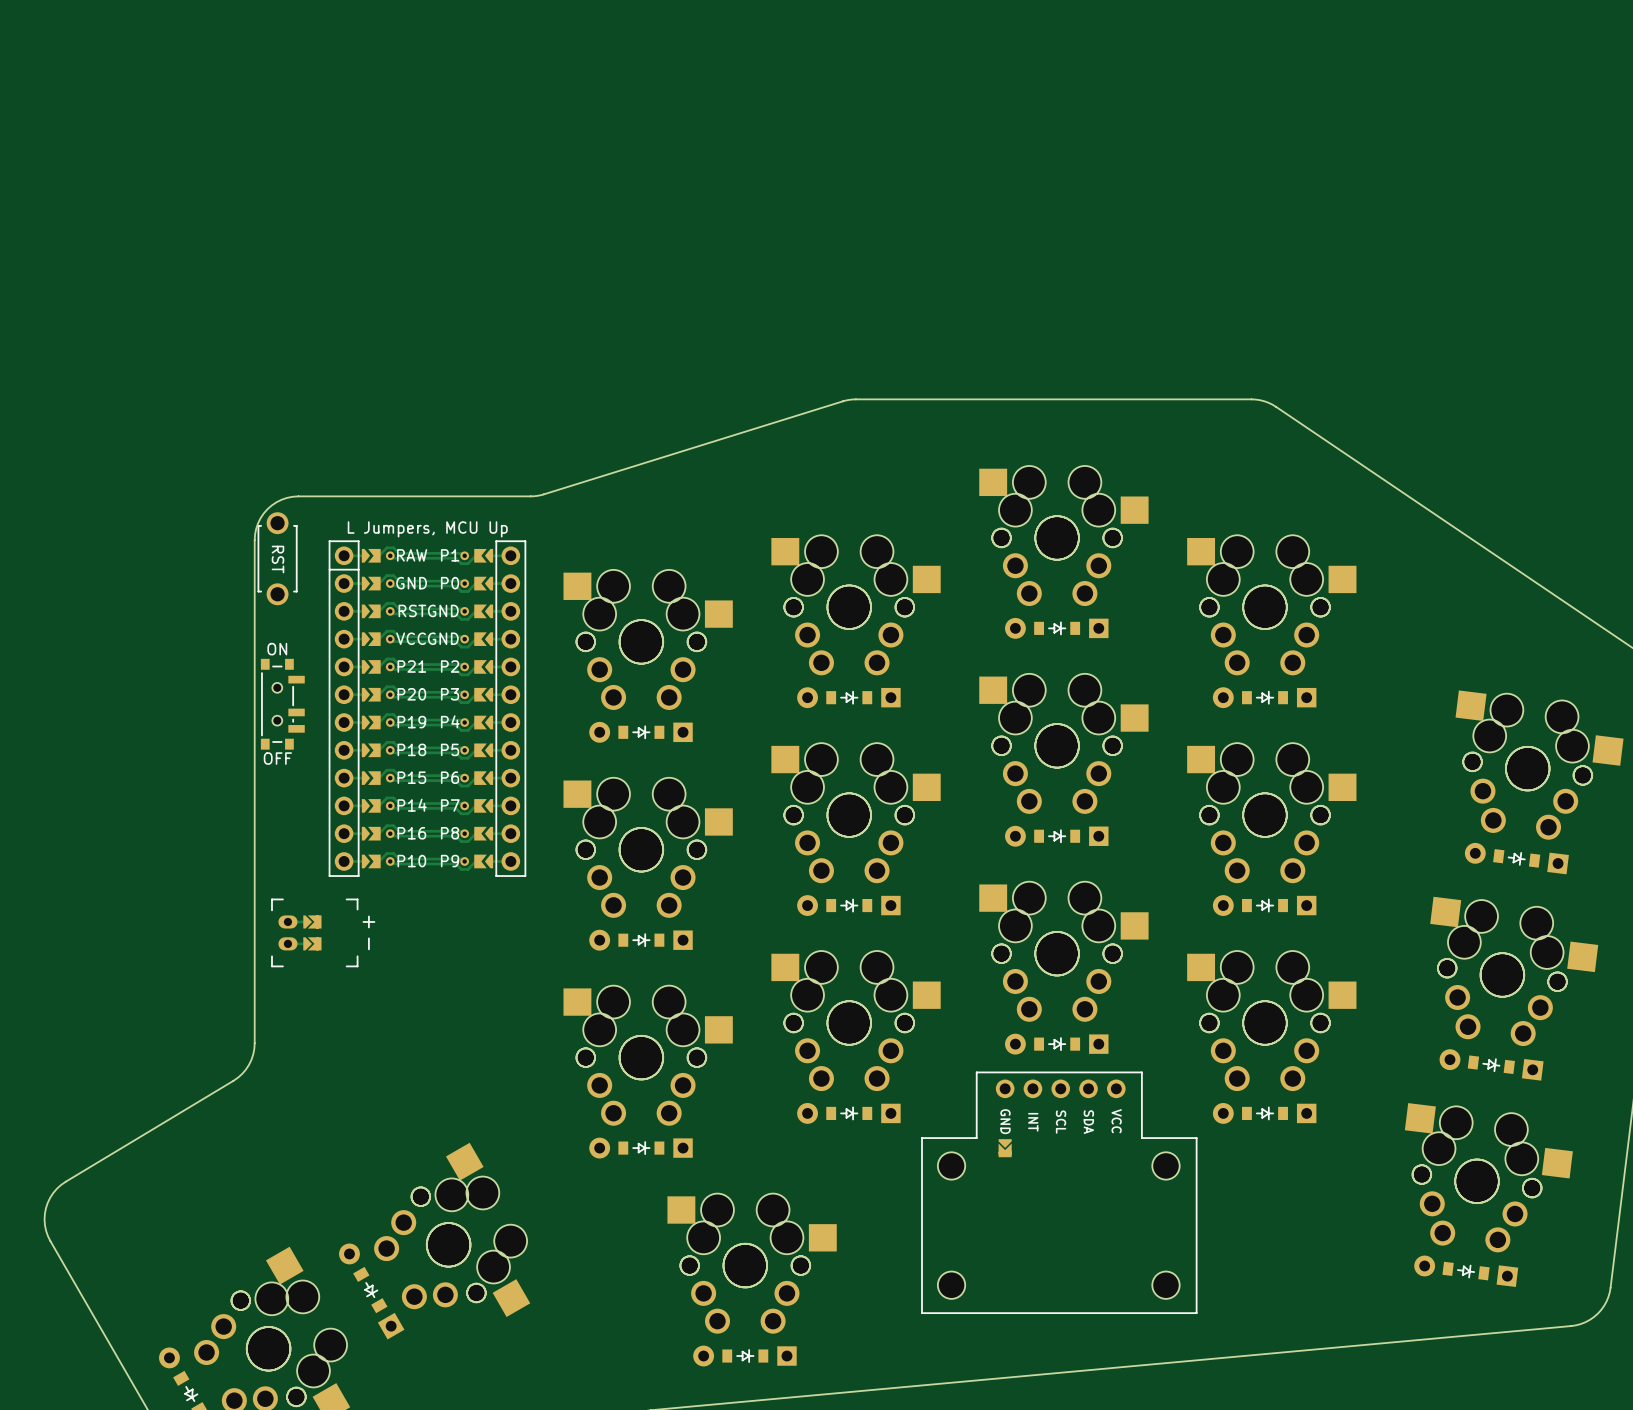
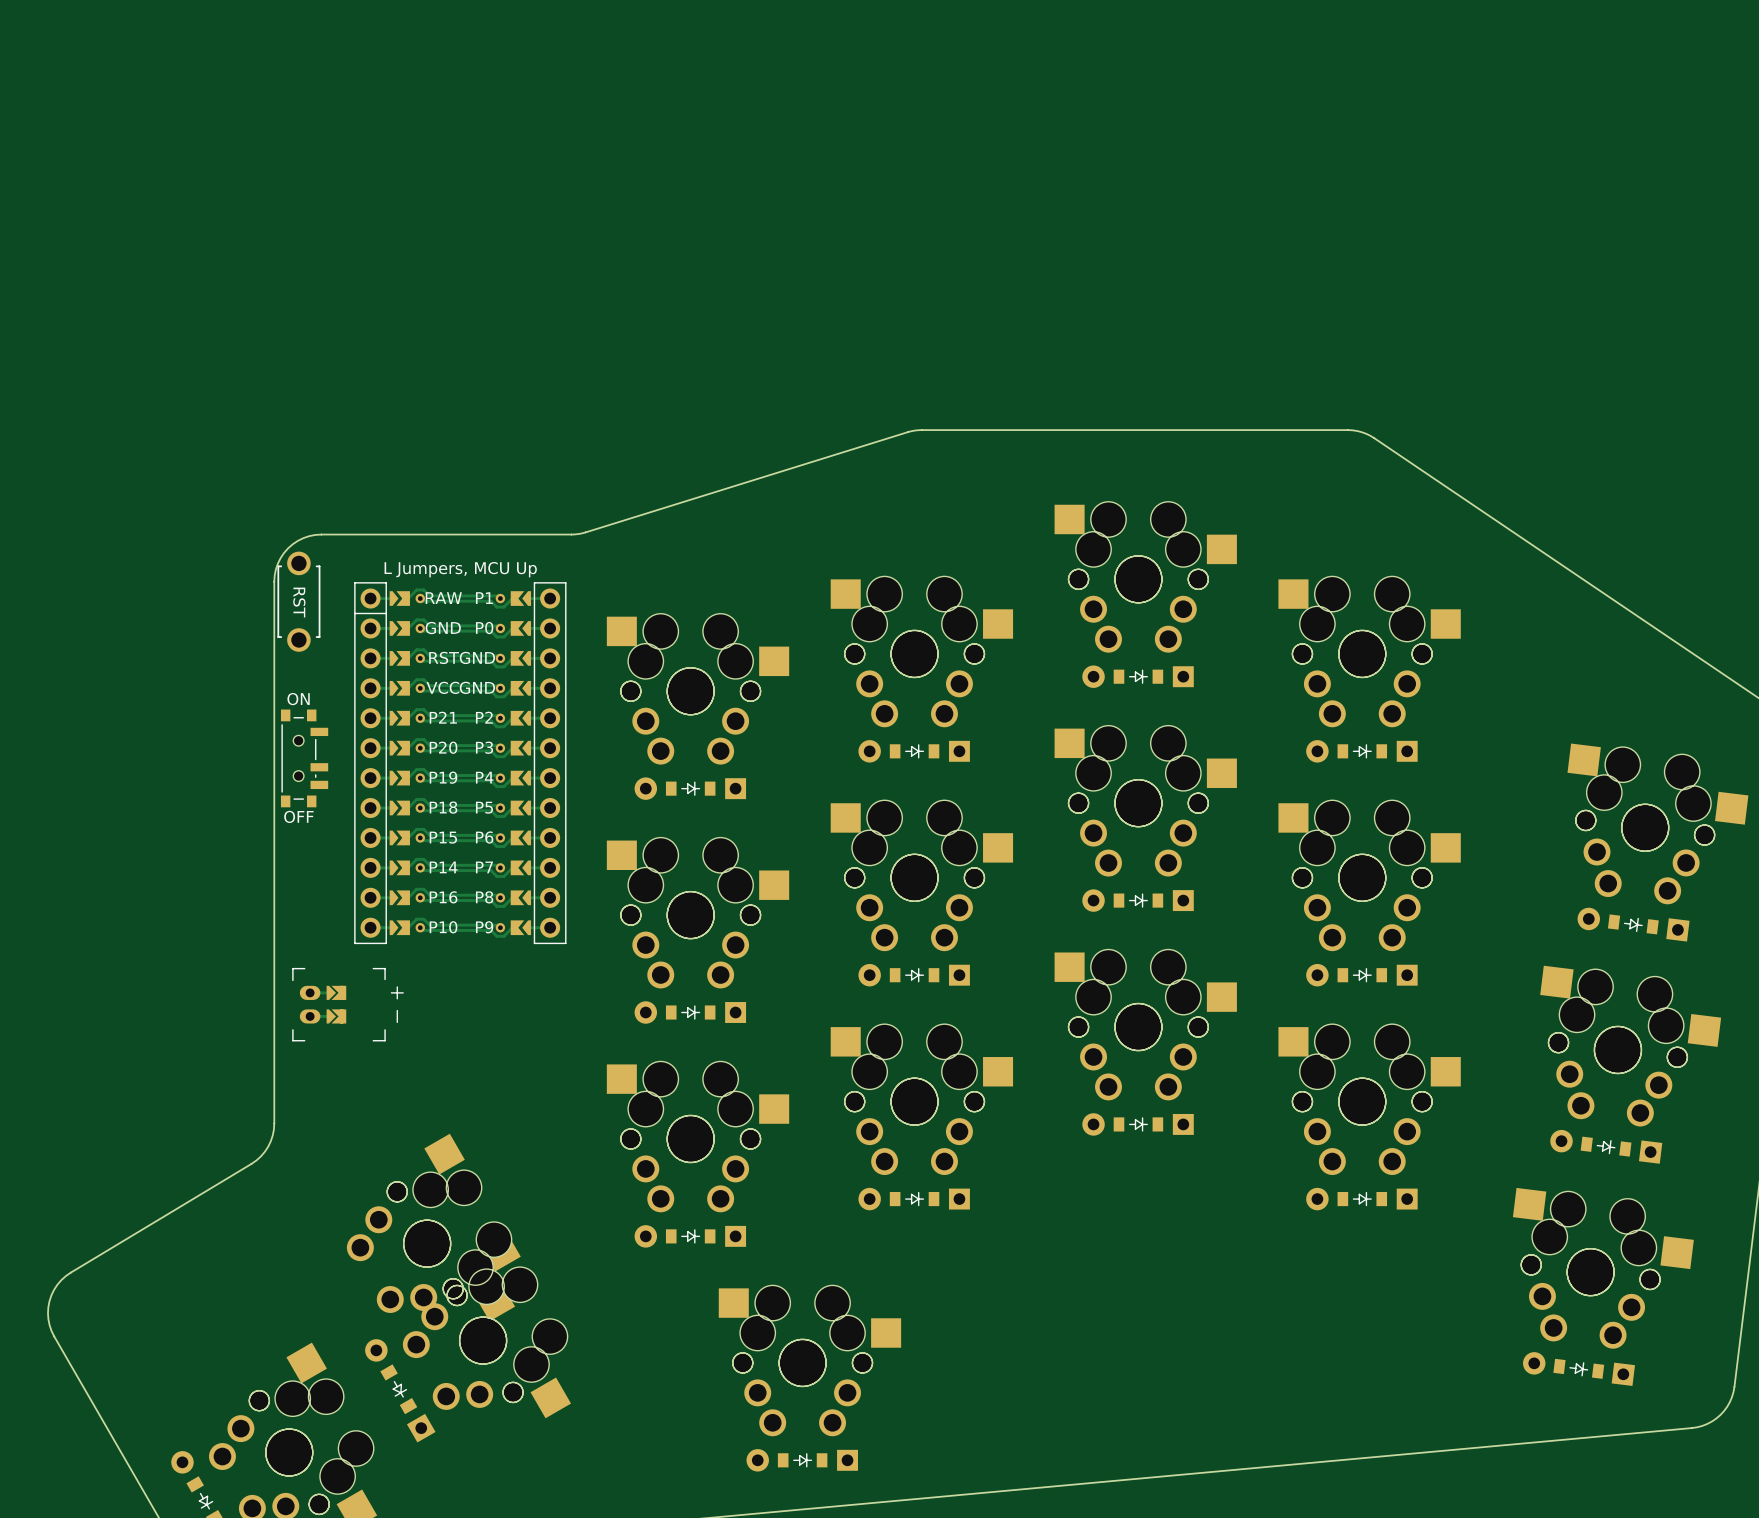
part: none -> (451, 1227)
part: none -> (407, 1247)
part: (1059, 1192) -> none

